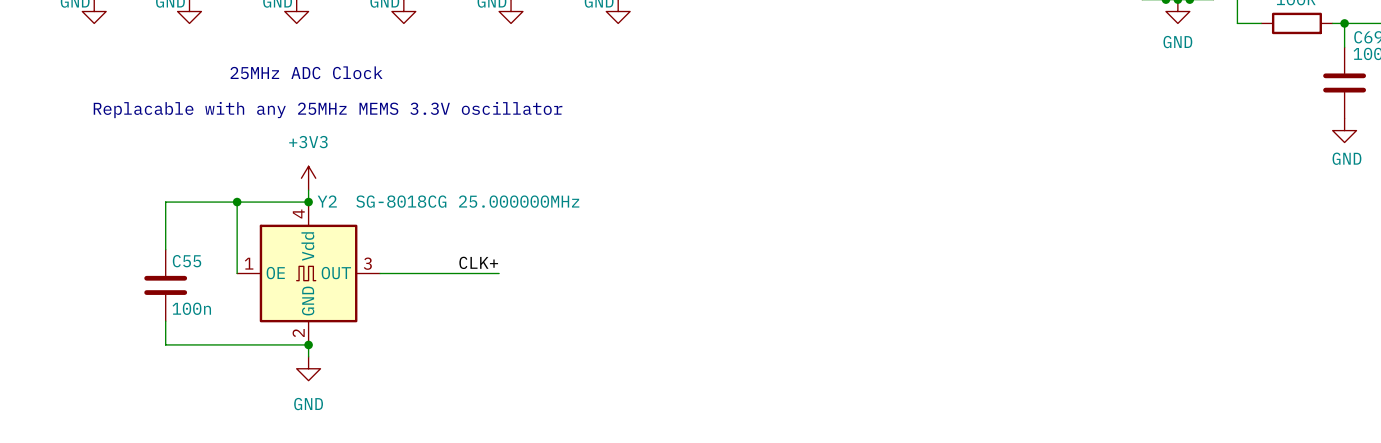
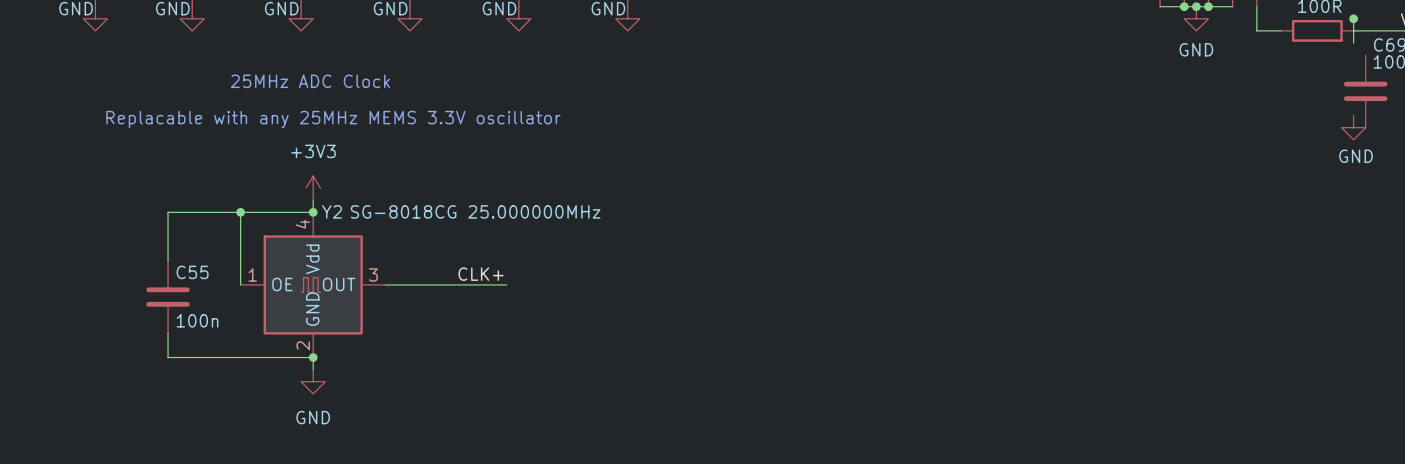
wire: (1344, 23) (1344, 47) -> (1353, 18) (1353, 42)
junction position: (1344, 23) -> (1353, 18)
power symbol position: GND (1344, 130) -> GND (1353, 127)

